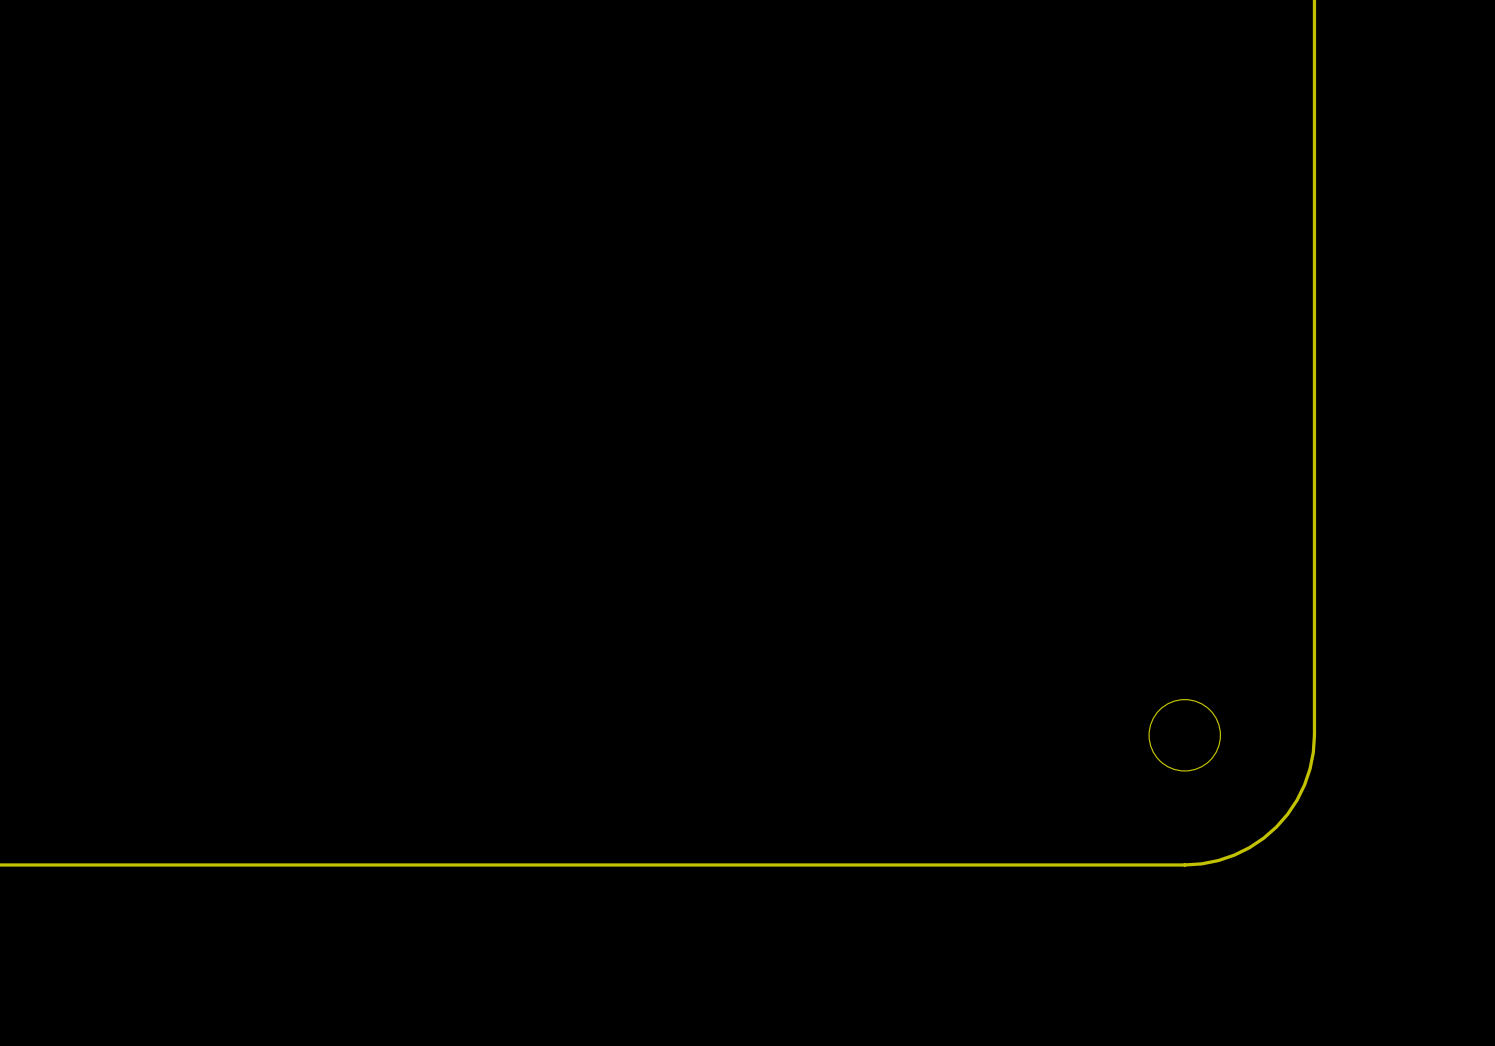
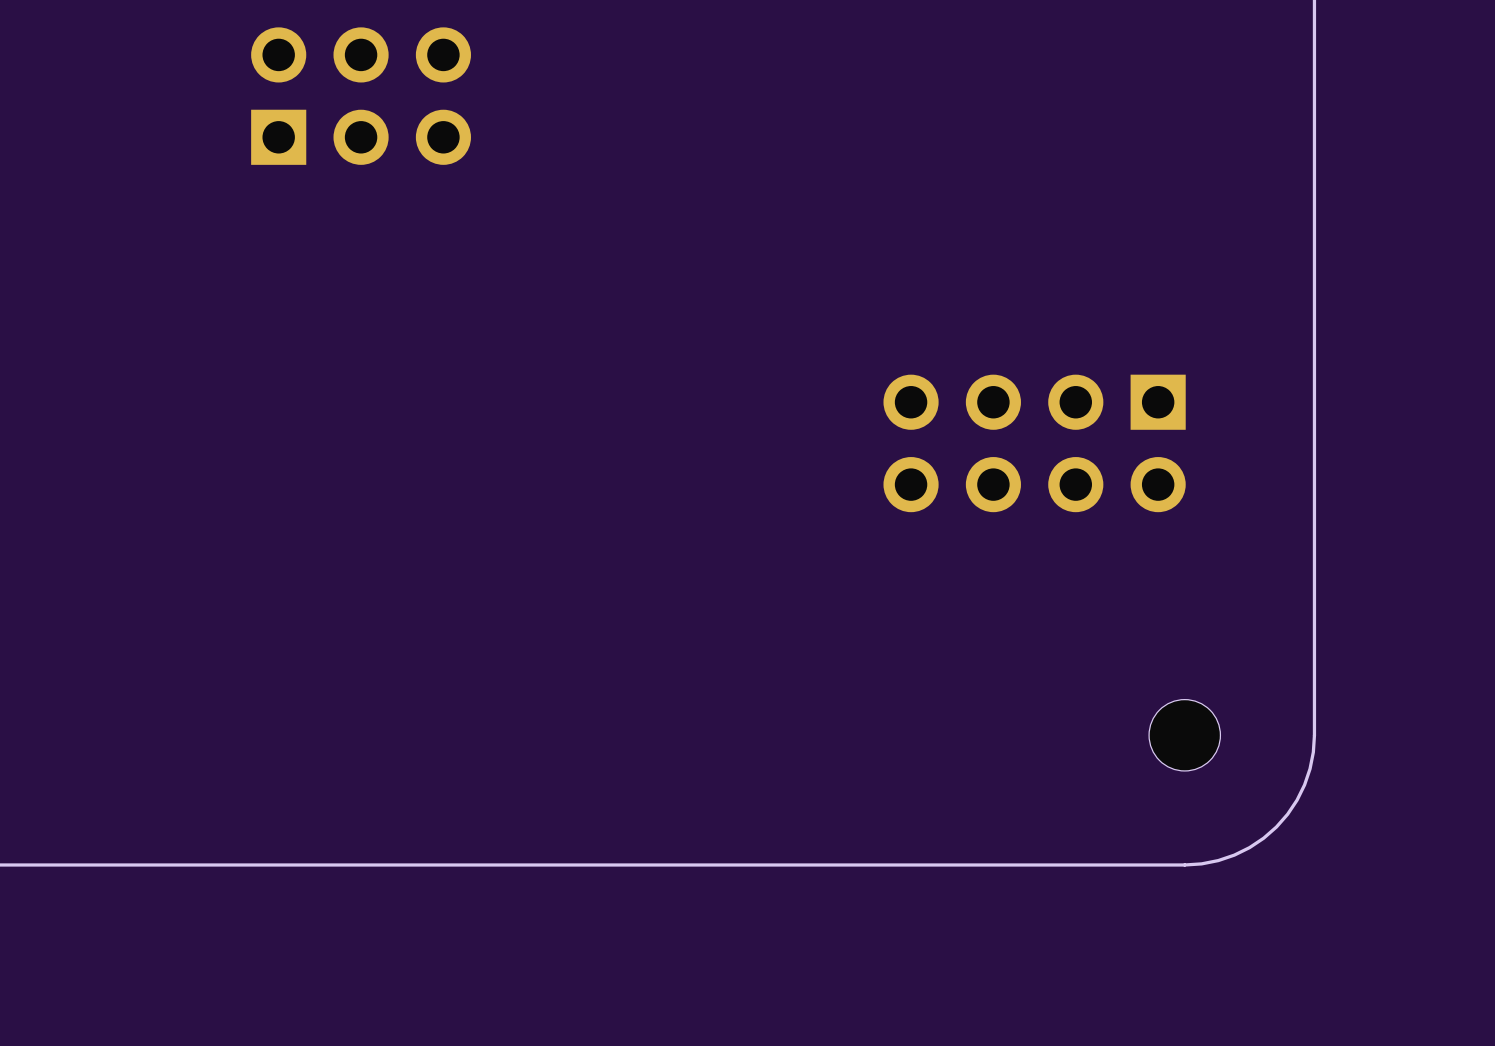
part: none -> (361, 96)
part: none -> (1034, 443)

